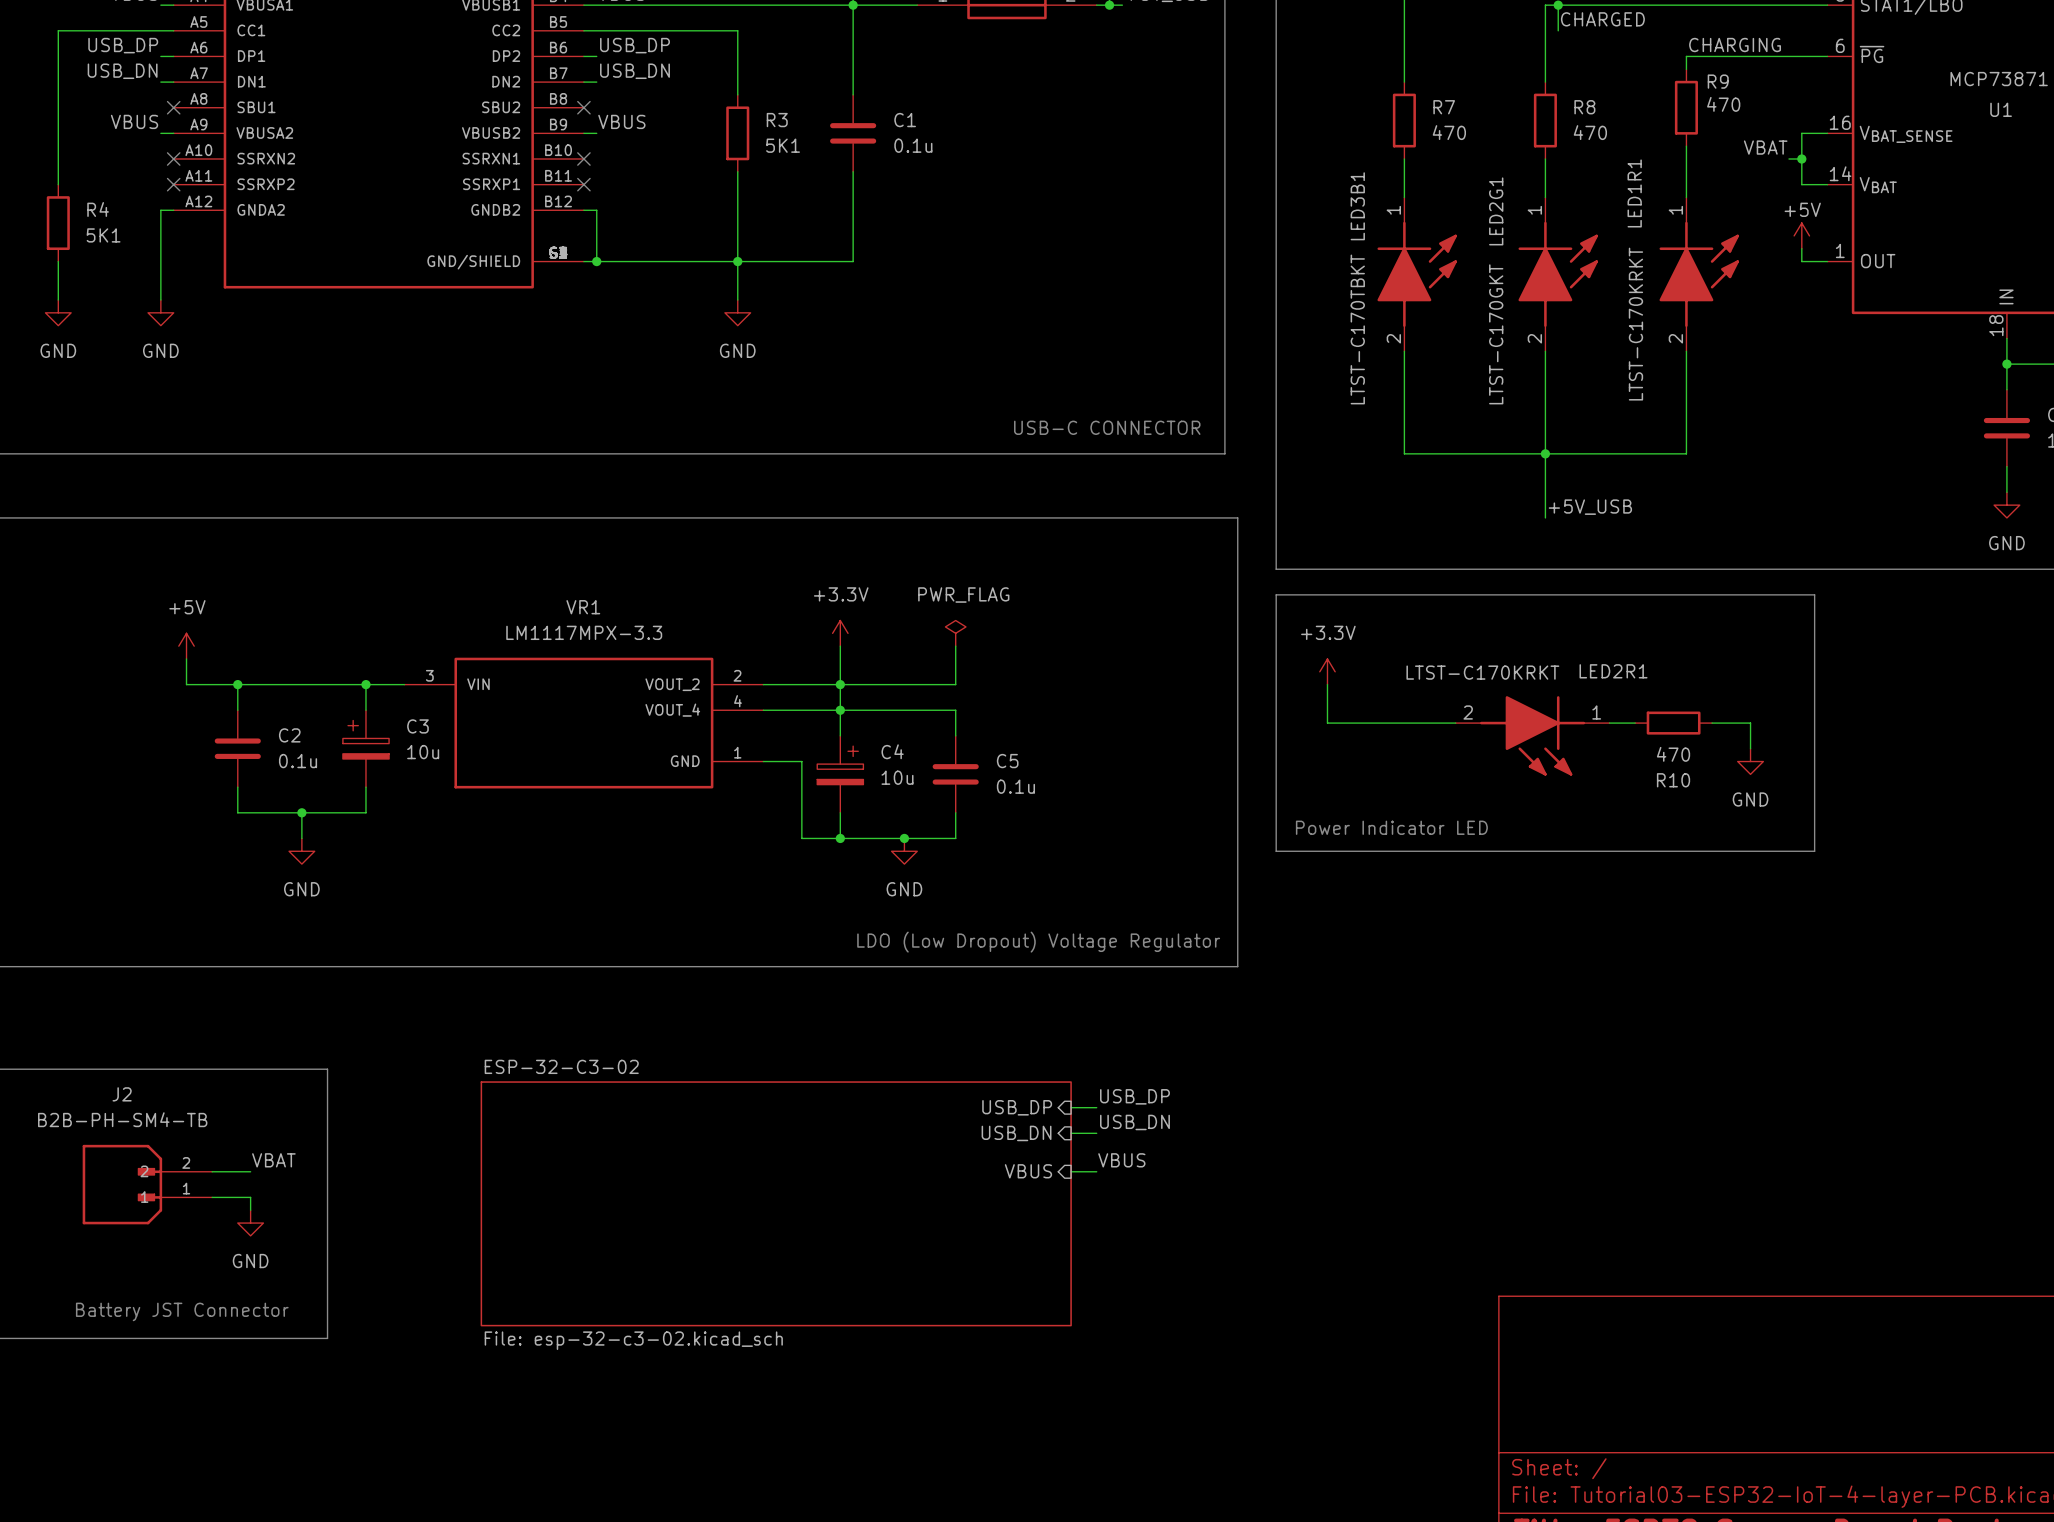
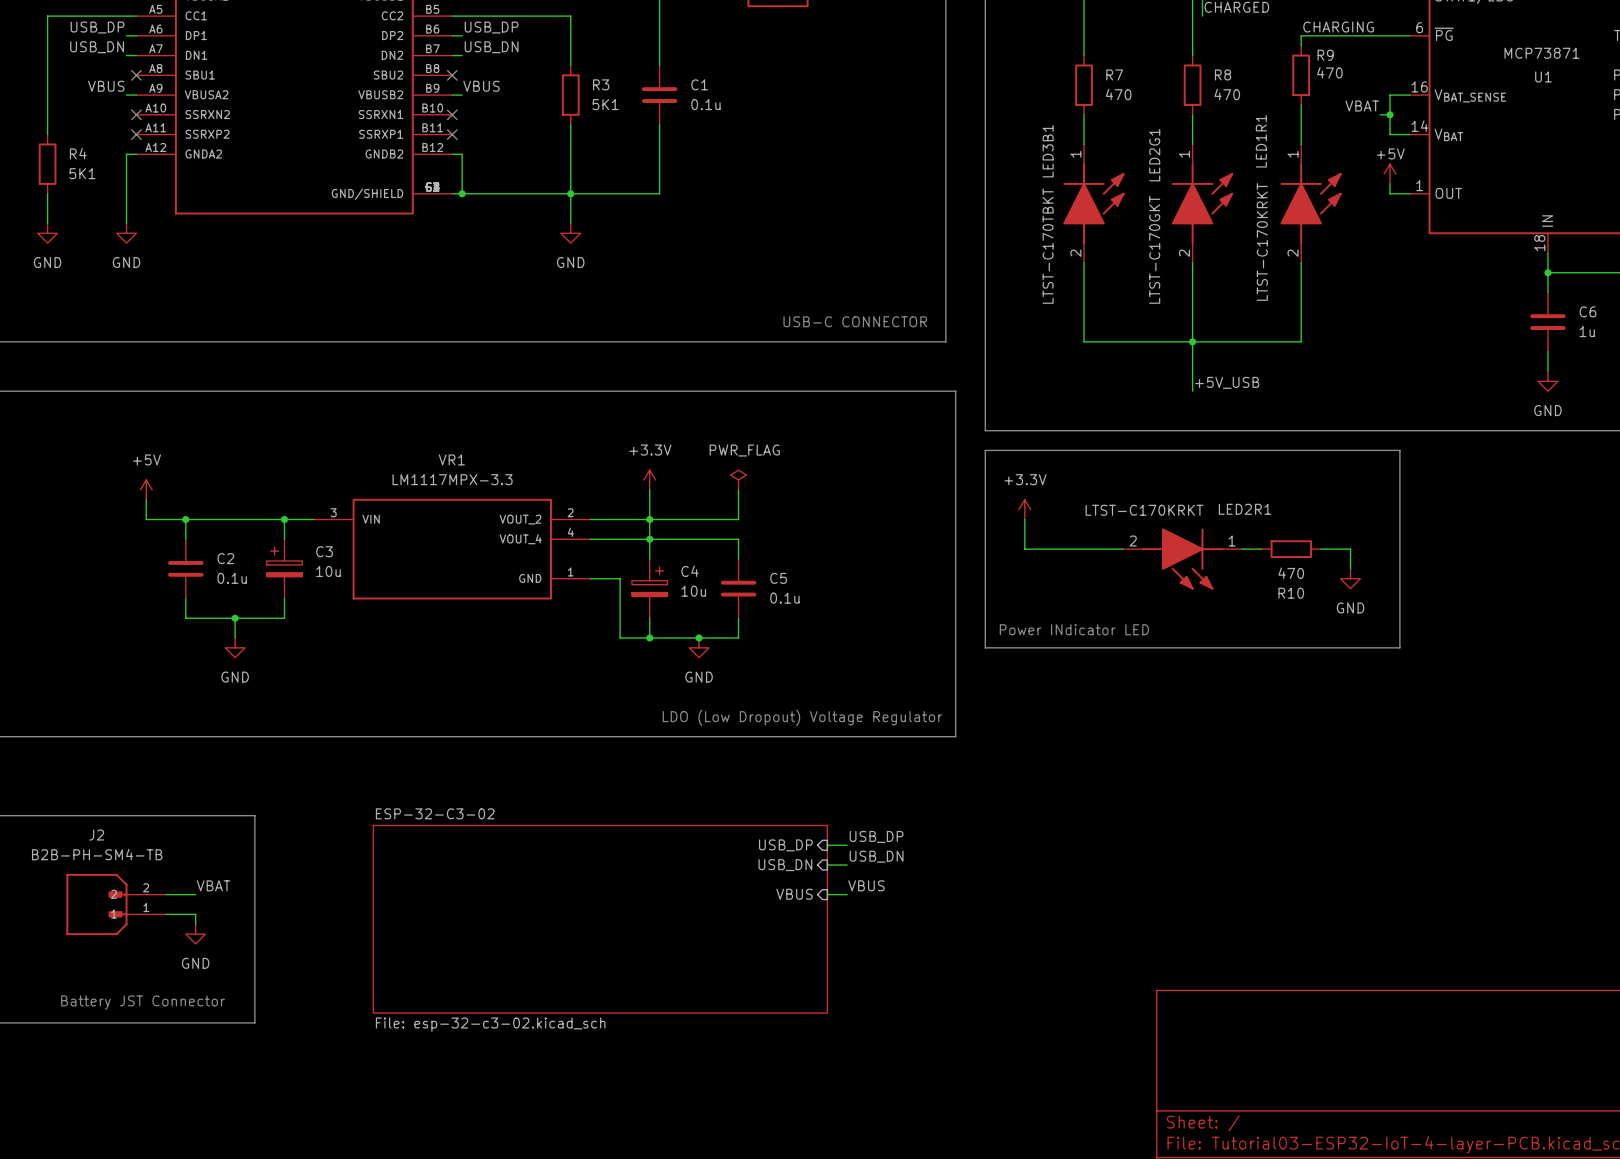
text: Power Indicator LED (1391, 827) -> Power INdicator LED (1074, 629)

